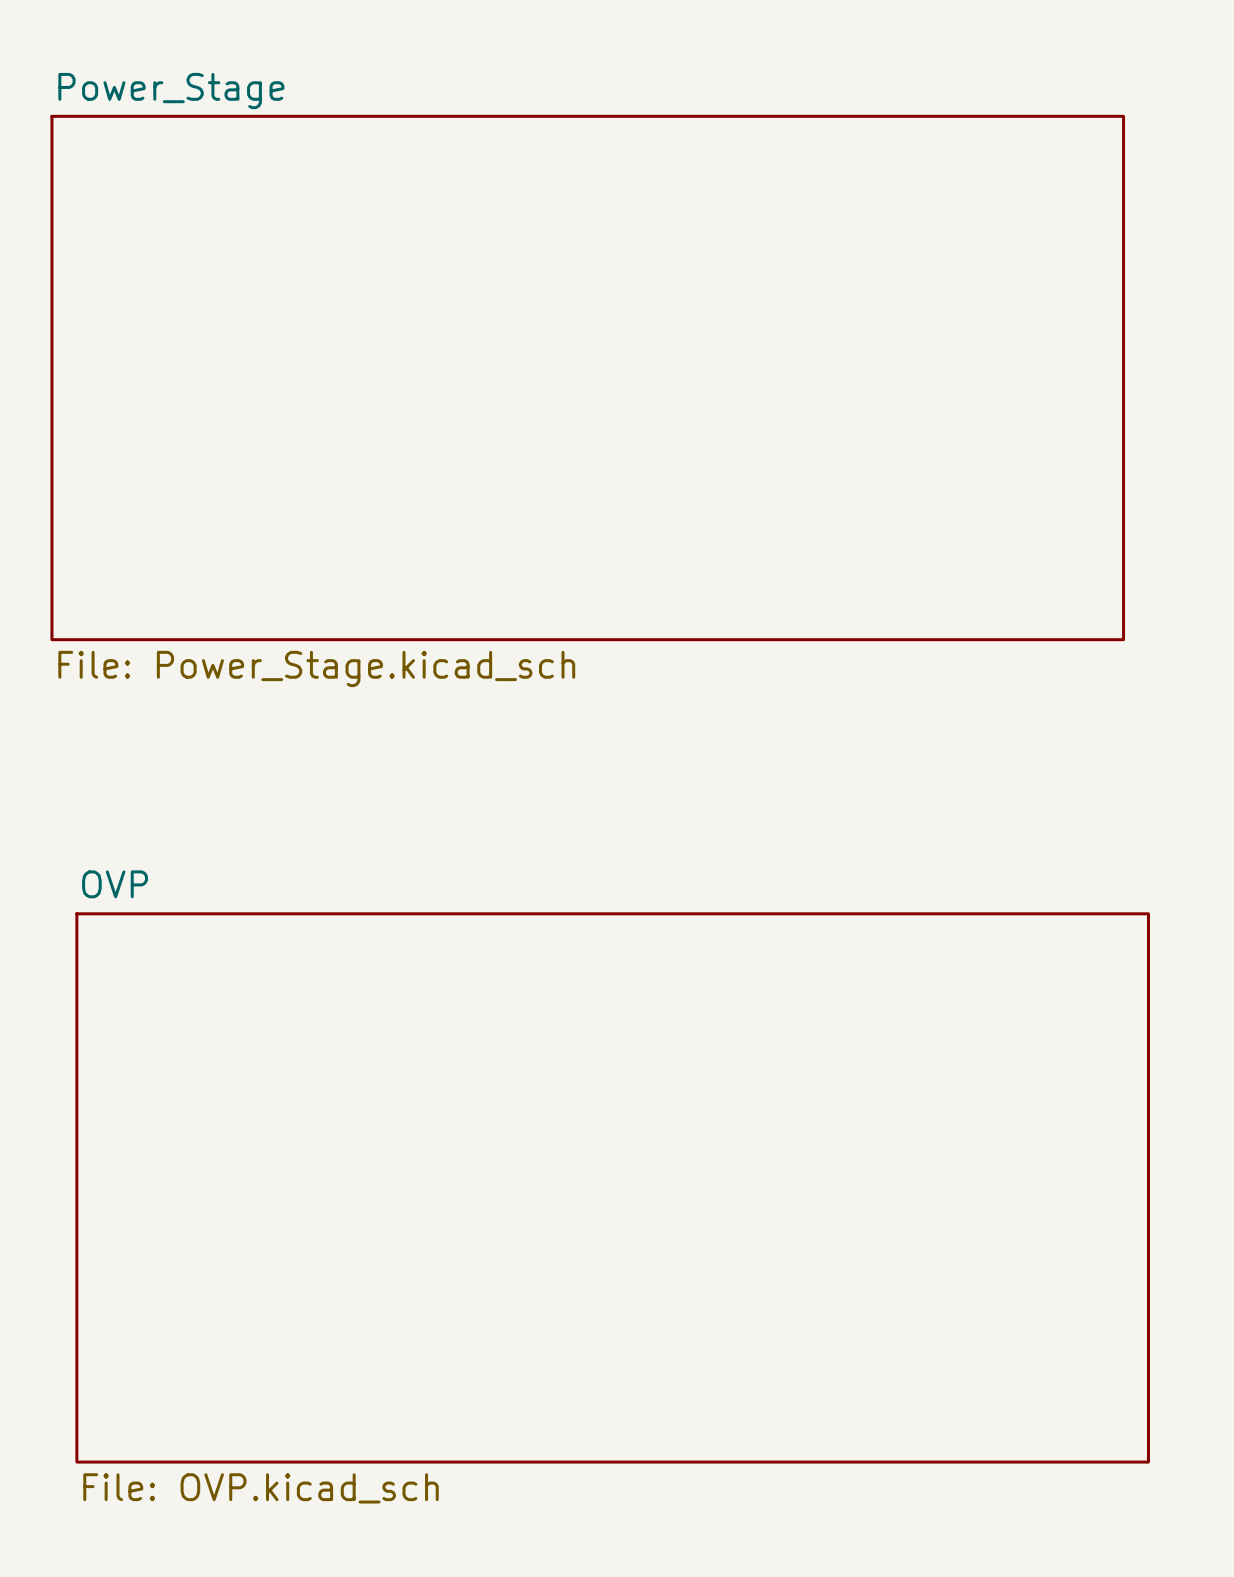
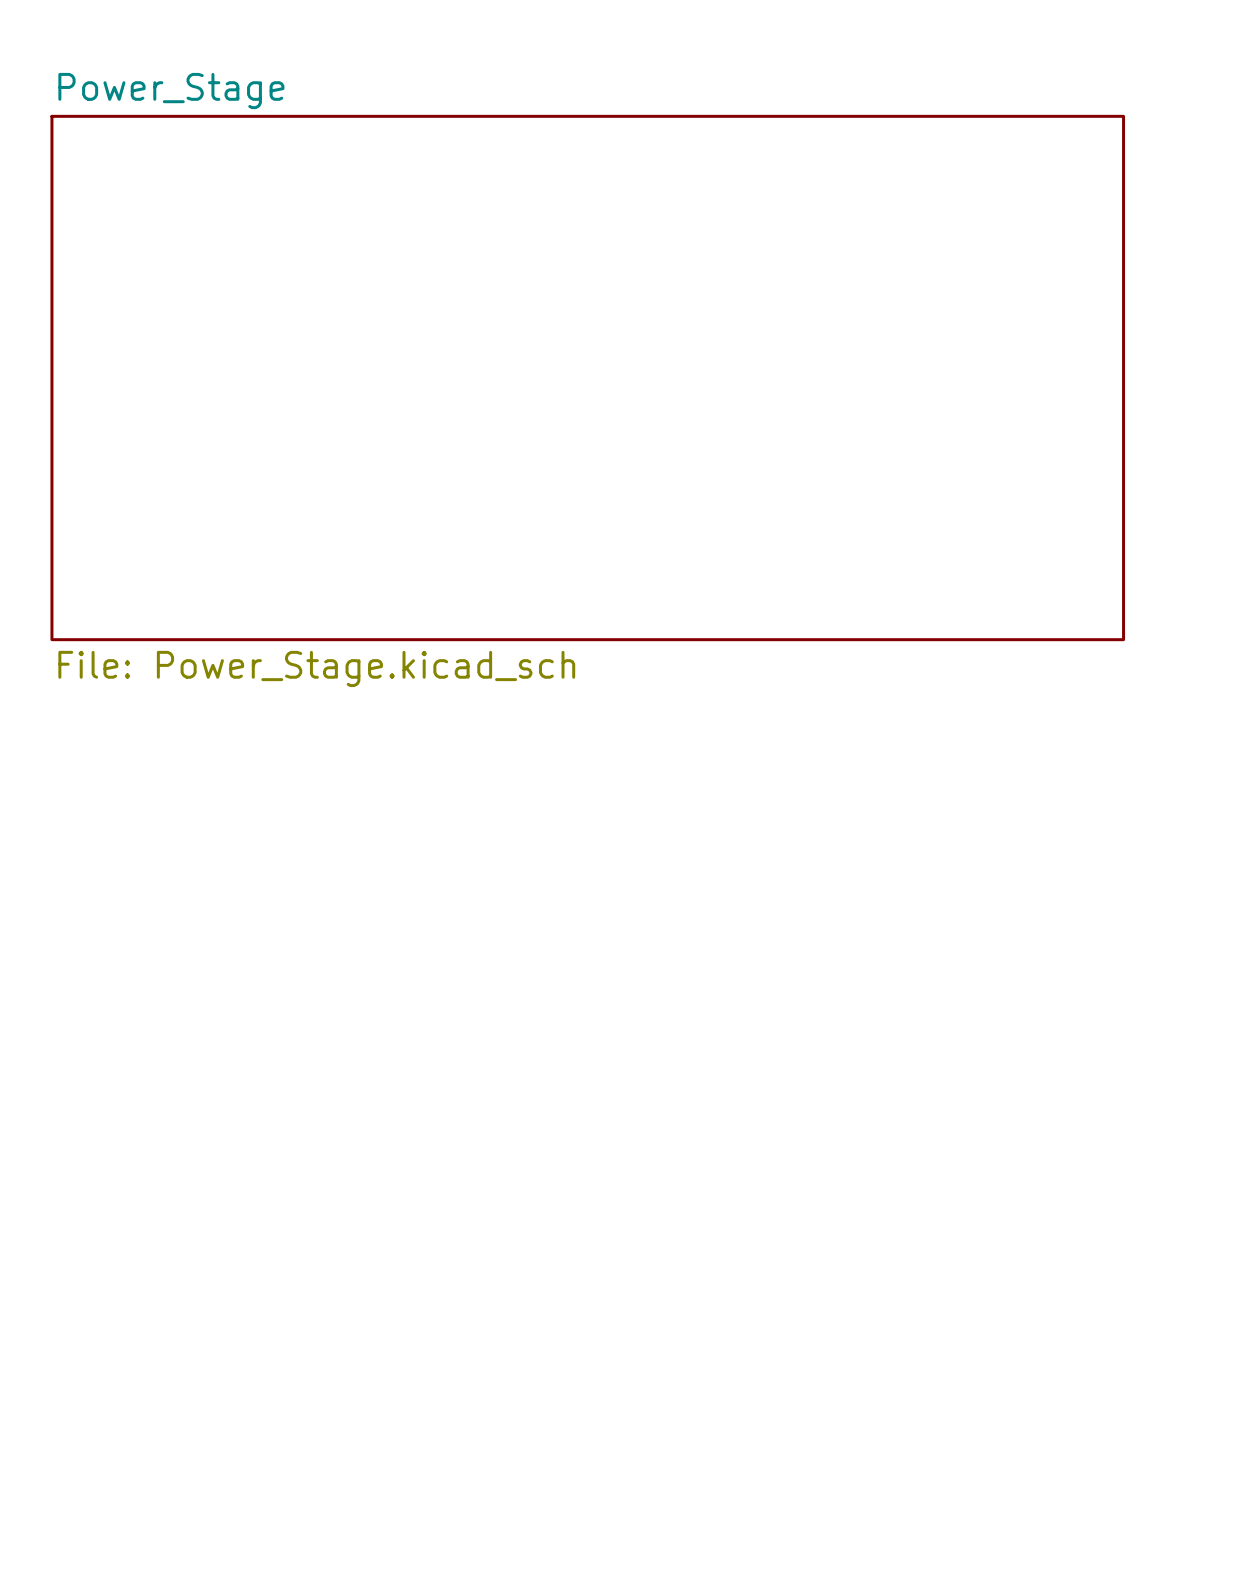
sheet OVP: File: OVP.kicad_sch (612, 1187) -> none

